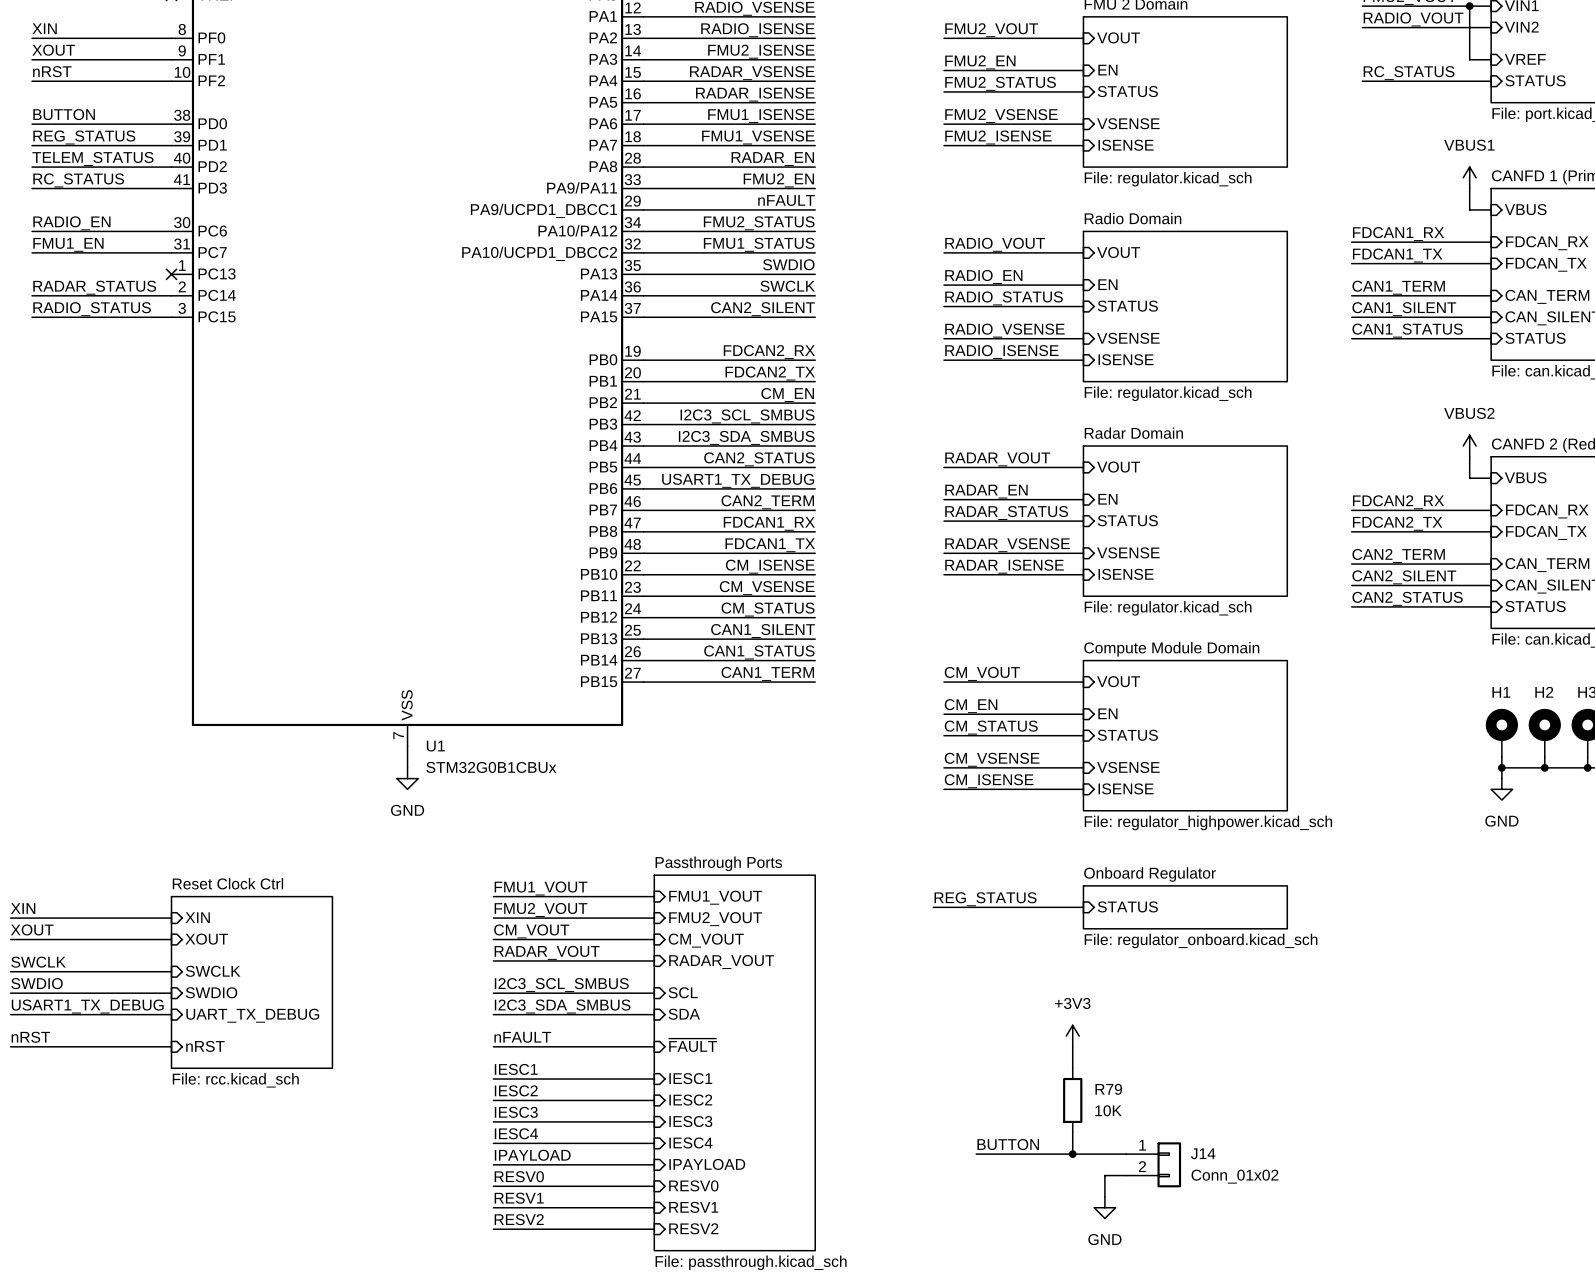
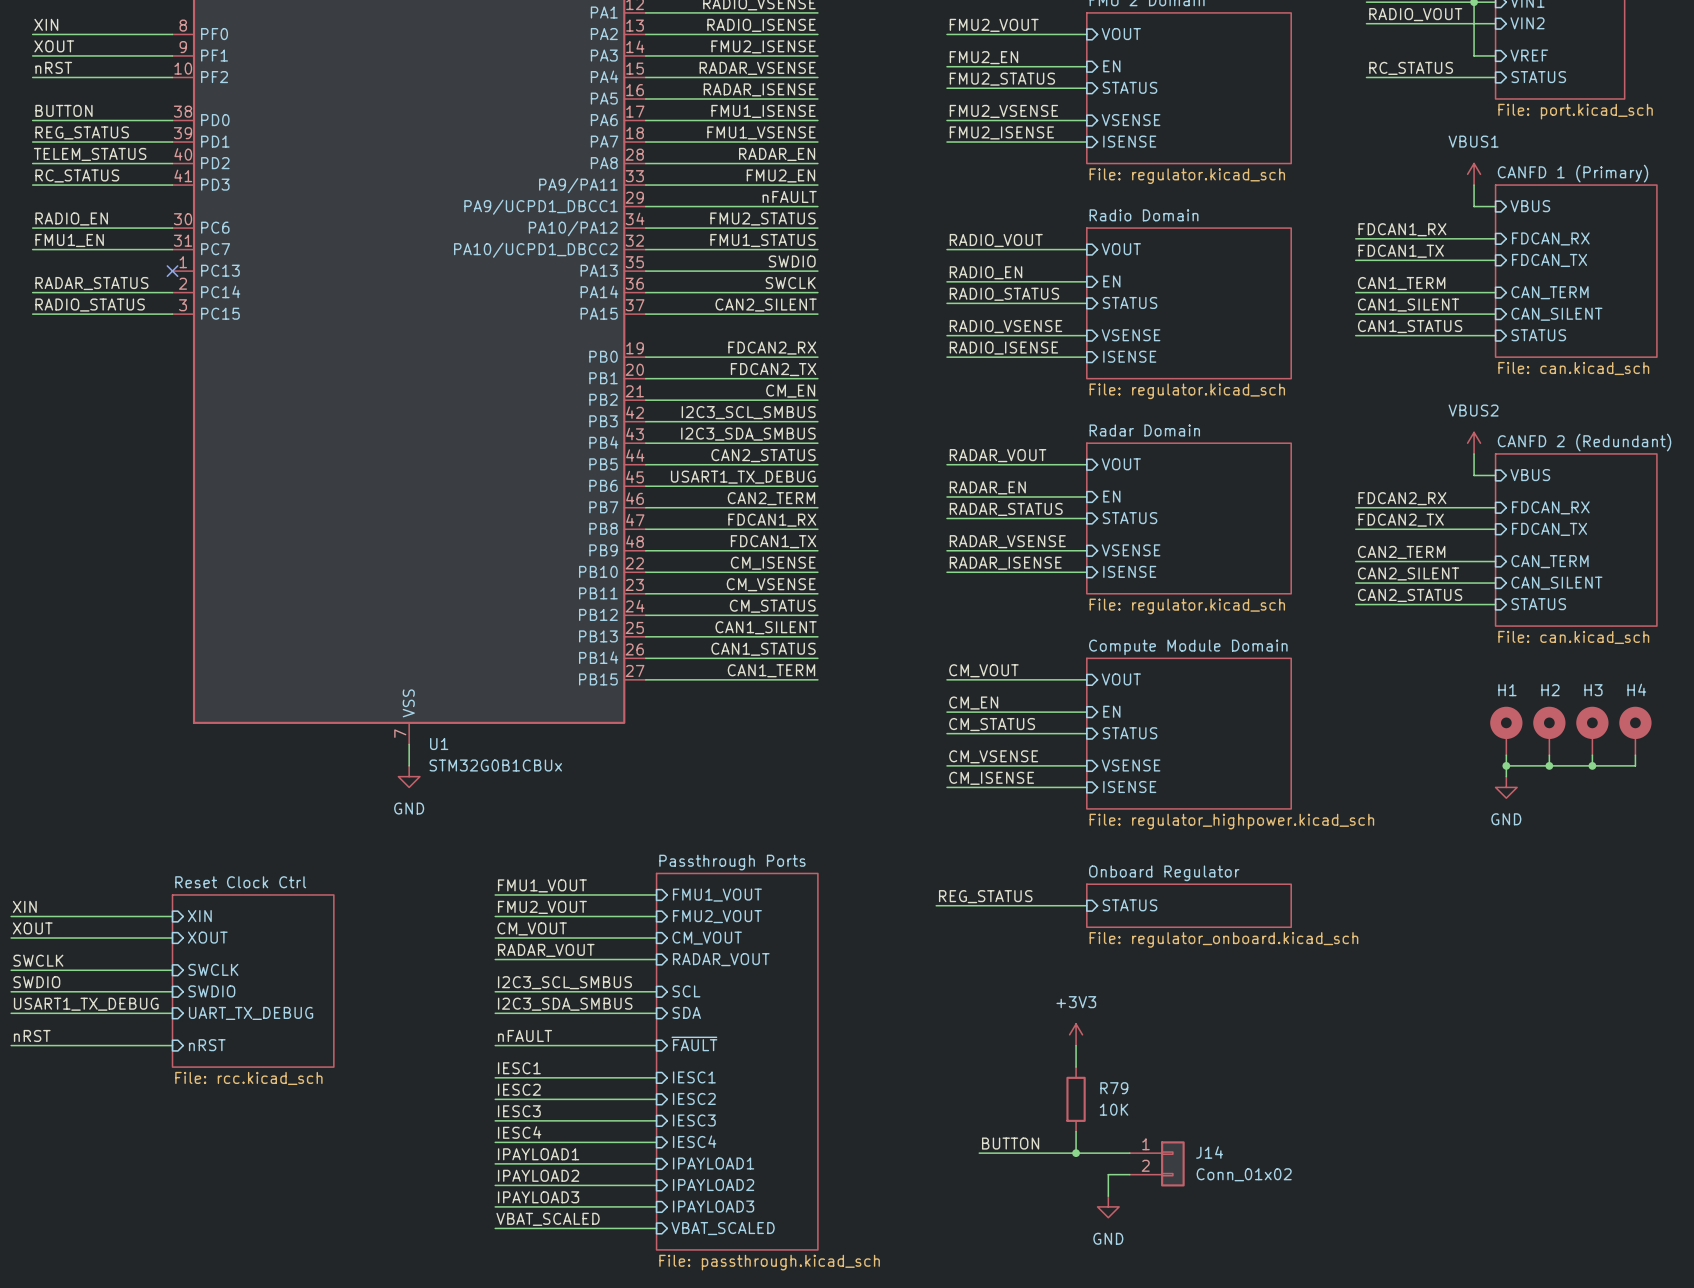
label: IPAYLOAD (532, 1155) -> IPAYLOAD1 (538, 1154)
sheet pin: IPAYLOAD (707, 1164) -> IPAYLOAD1 (713, 1163)
label: RESV0 (519, 1176) -> IPAYLOAD2 (538, 1175)
sheet pin: RESV0 (693, 1185) -> IPAYLOAD2 (713, 1185)
label: RESV1 (519, 1198) -> IPAYLOAD3 (538, 1197)
sheet pin: RESV1 (693, 1207) -> IPAYLOAD3 (713, 1206)
label: RESV2 (519, 1219) -> VBAT_SCALED (548, 1219)
sheet pin: RESV2 (693, 1228) -> VBAT_SCALED (723, 1228)

